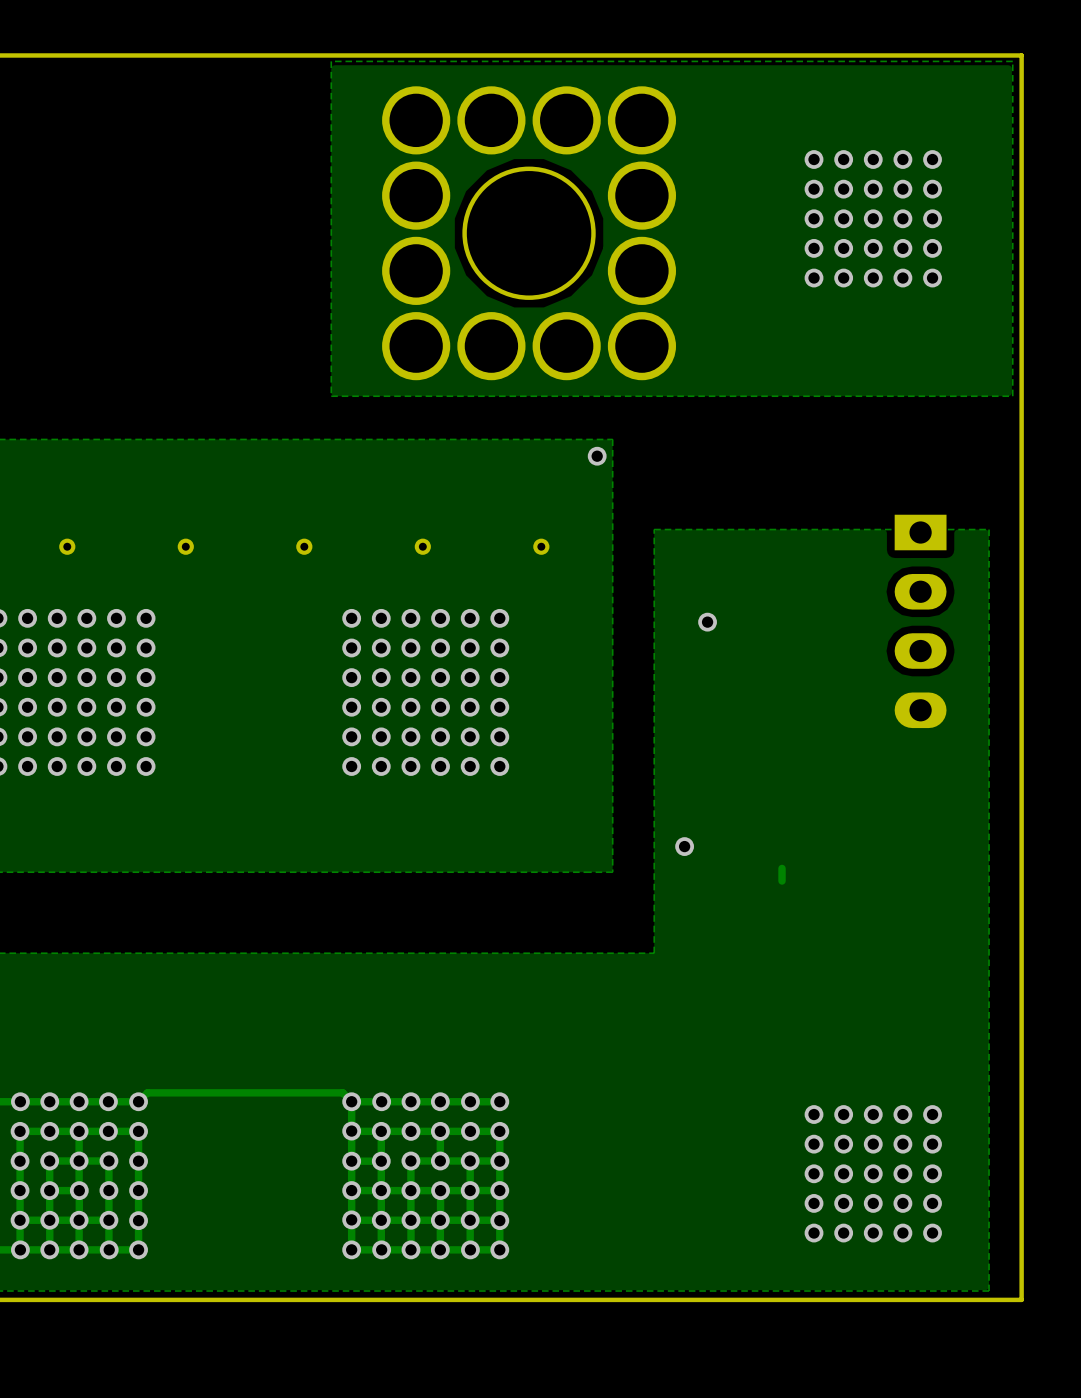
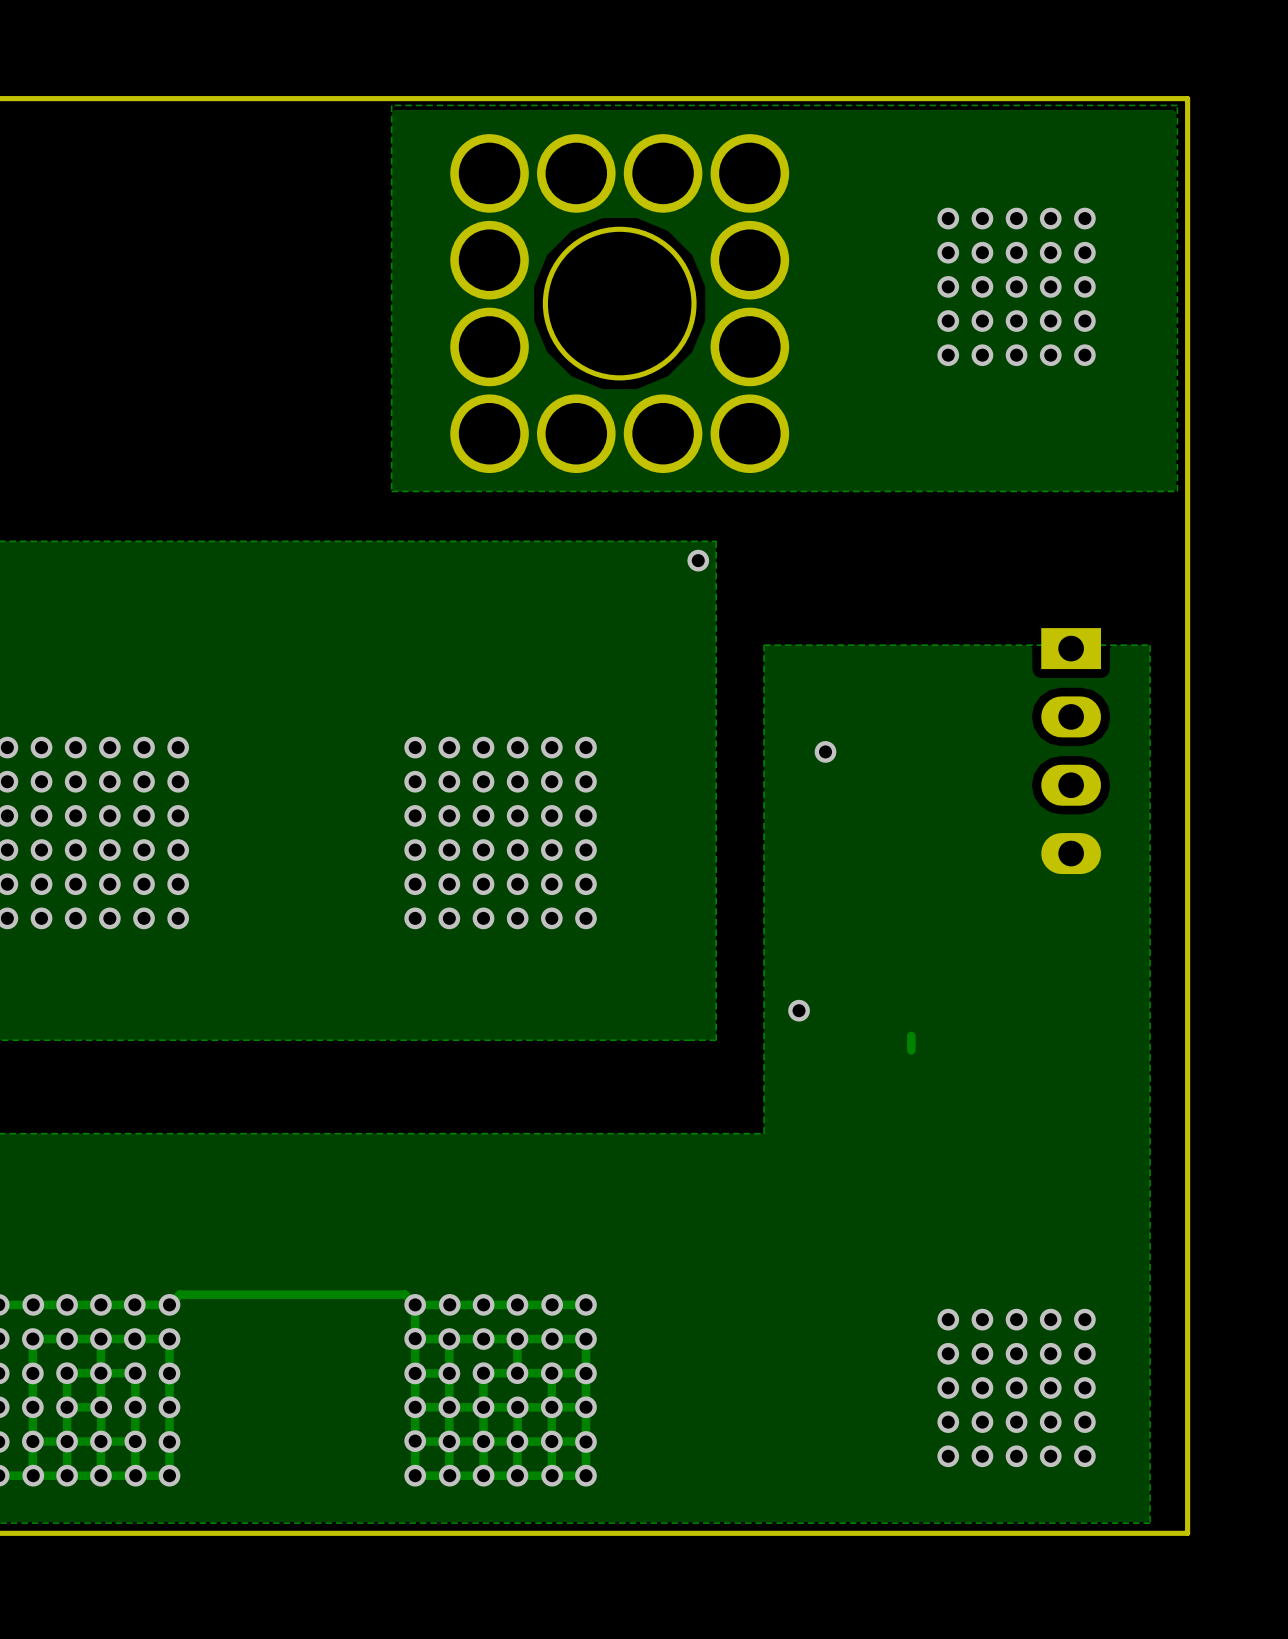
part: (67, 546) -> none
part: (185, 546) -> none
part: (304, 546) -> none
part: (422, 546) -> none
part: (541, 546) -> none

